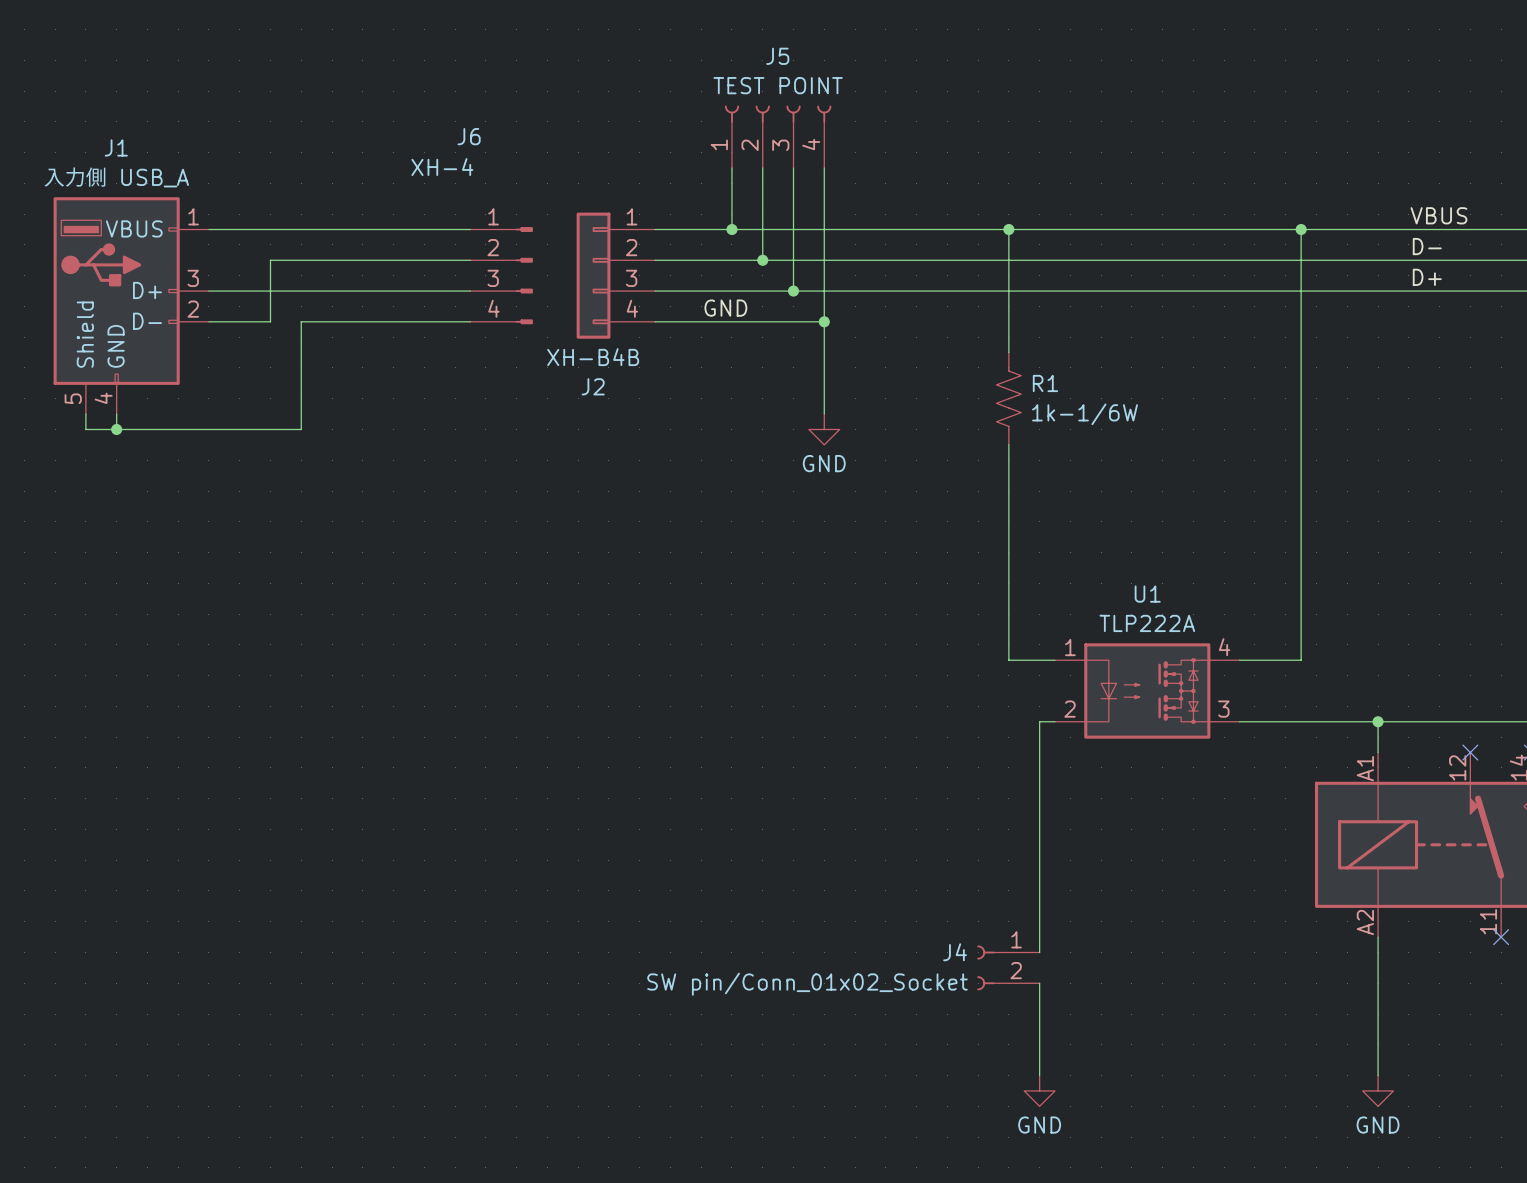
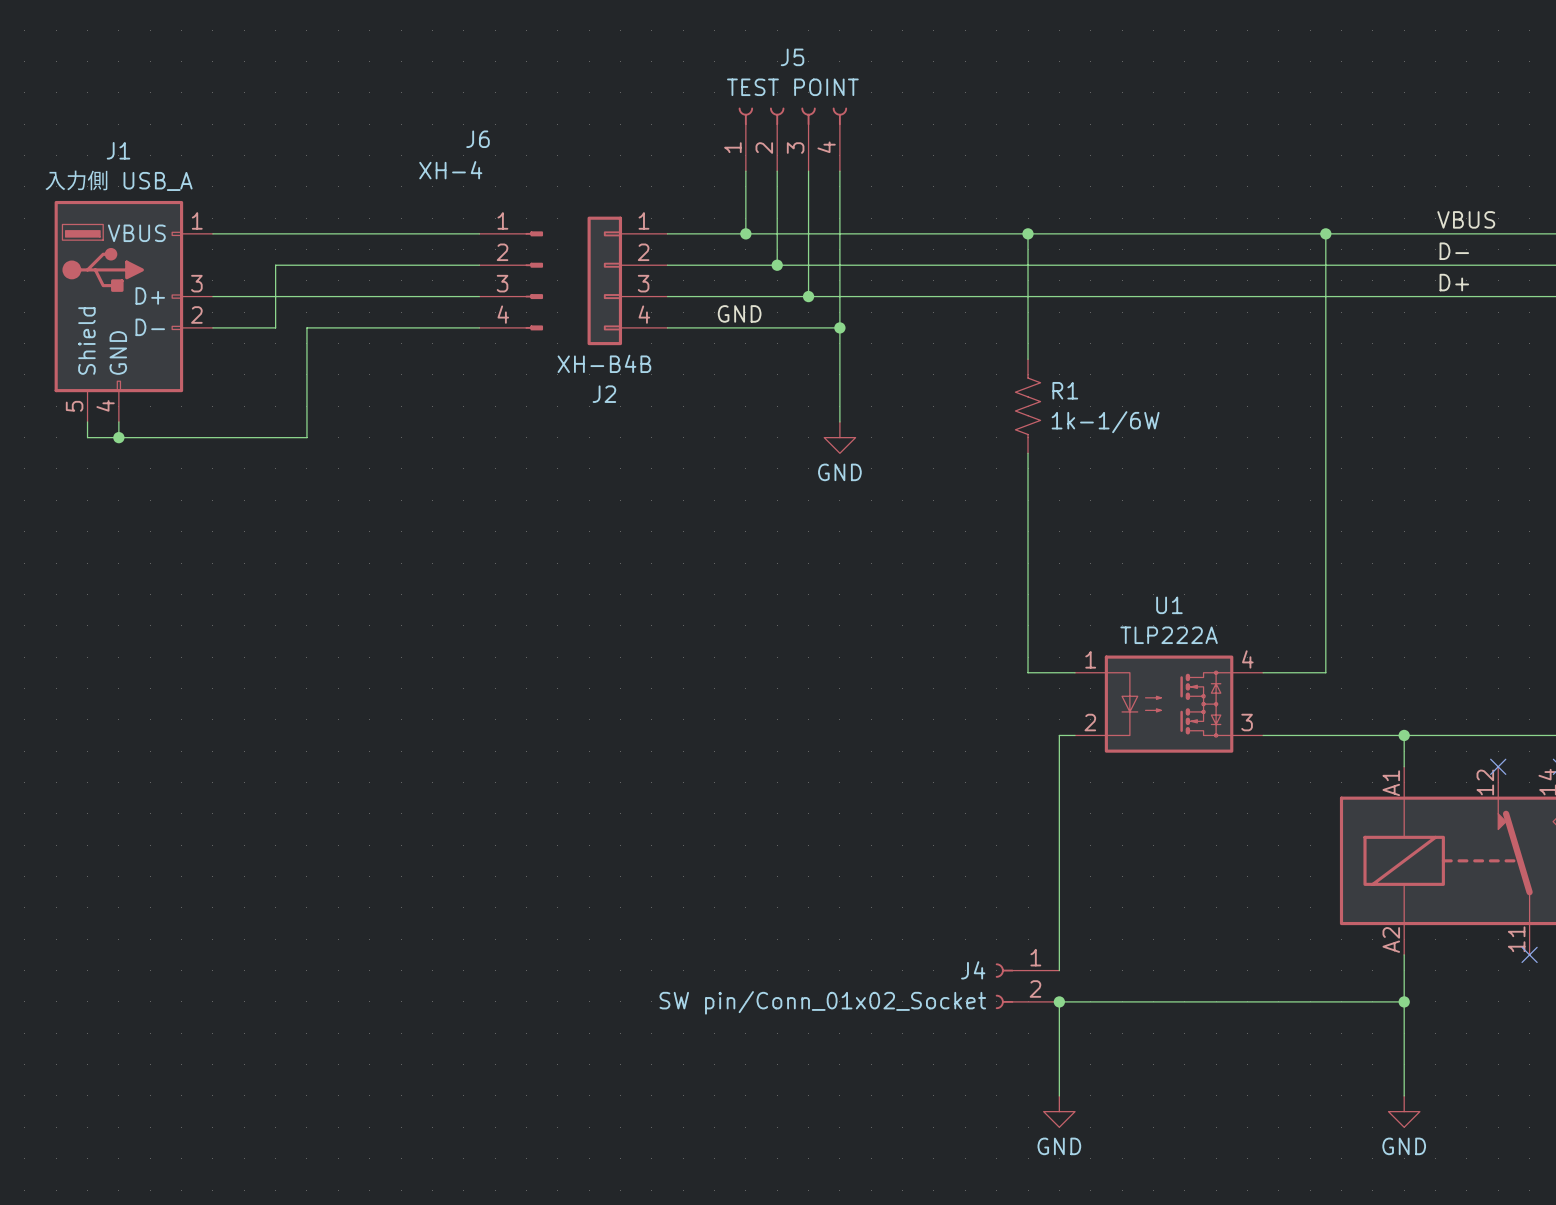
wire: none -> (1059, 1001) (1404, 1001)
junction: none -> (1059, 1001)
junction: none -> (1404, 1001)

